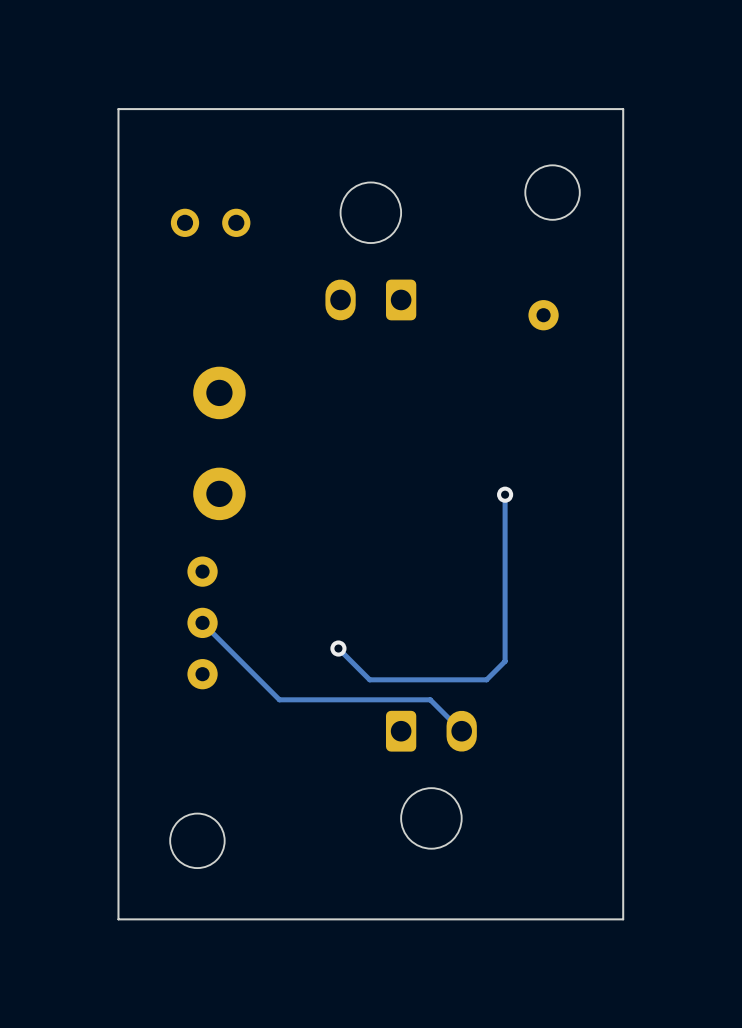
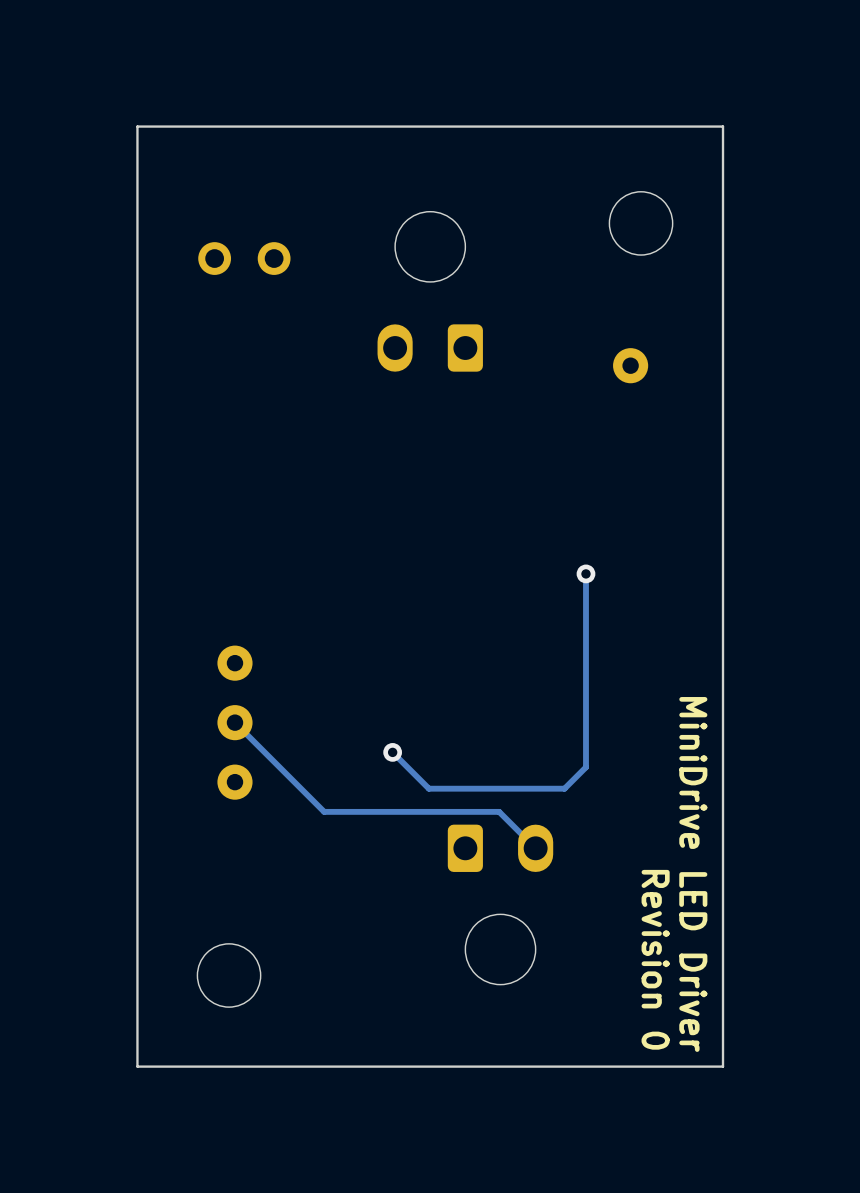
part: (219, 443) -> none
text: none -> MiniDrive LED Driver (693, 874)
text: none -> Revision 0 (655, 959)

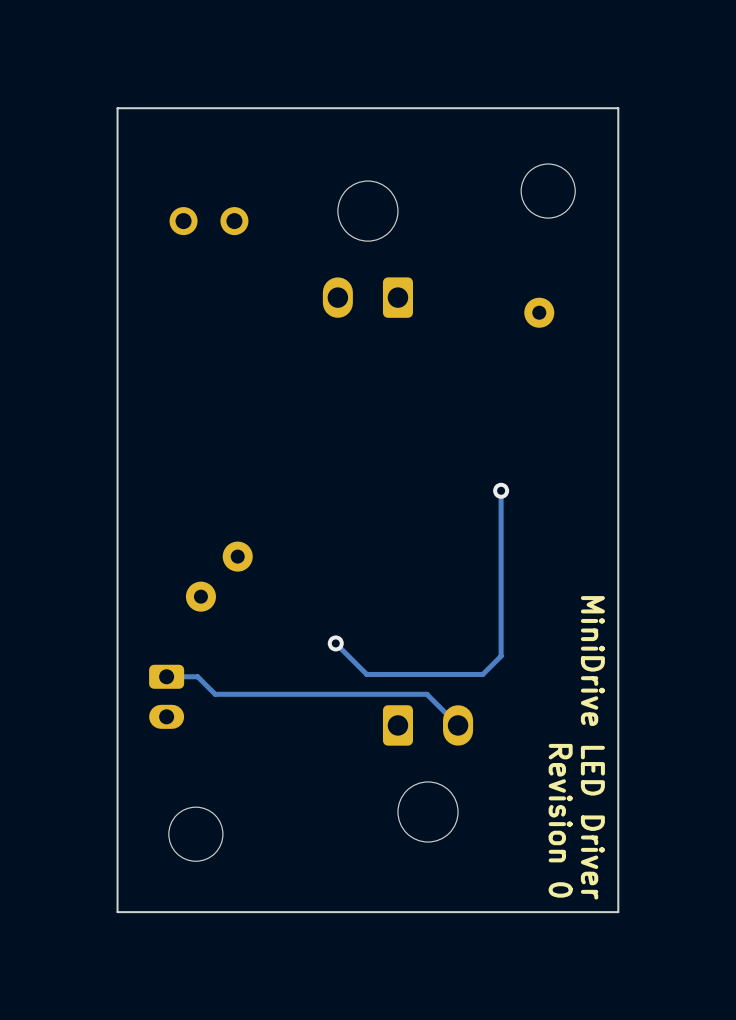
part: none -> (237, 556)
part: (234, 663) -> none
part: none -> (200, 596)
track: (234, 722) (324, 811) -> (166, 676) (197, 676) (215, 694) (277, 694)
part: (234, 722) -> none
part: (234, 782) -> none
part: none -> (166, 696)

